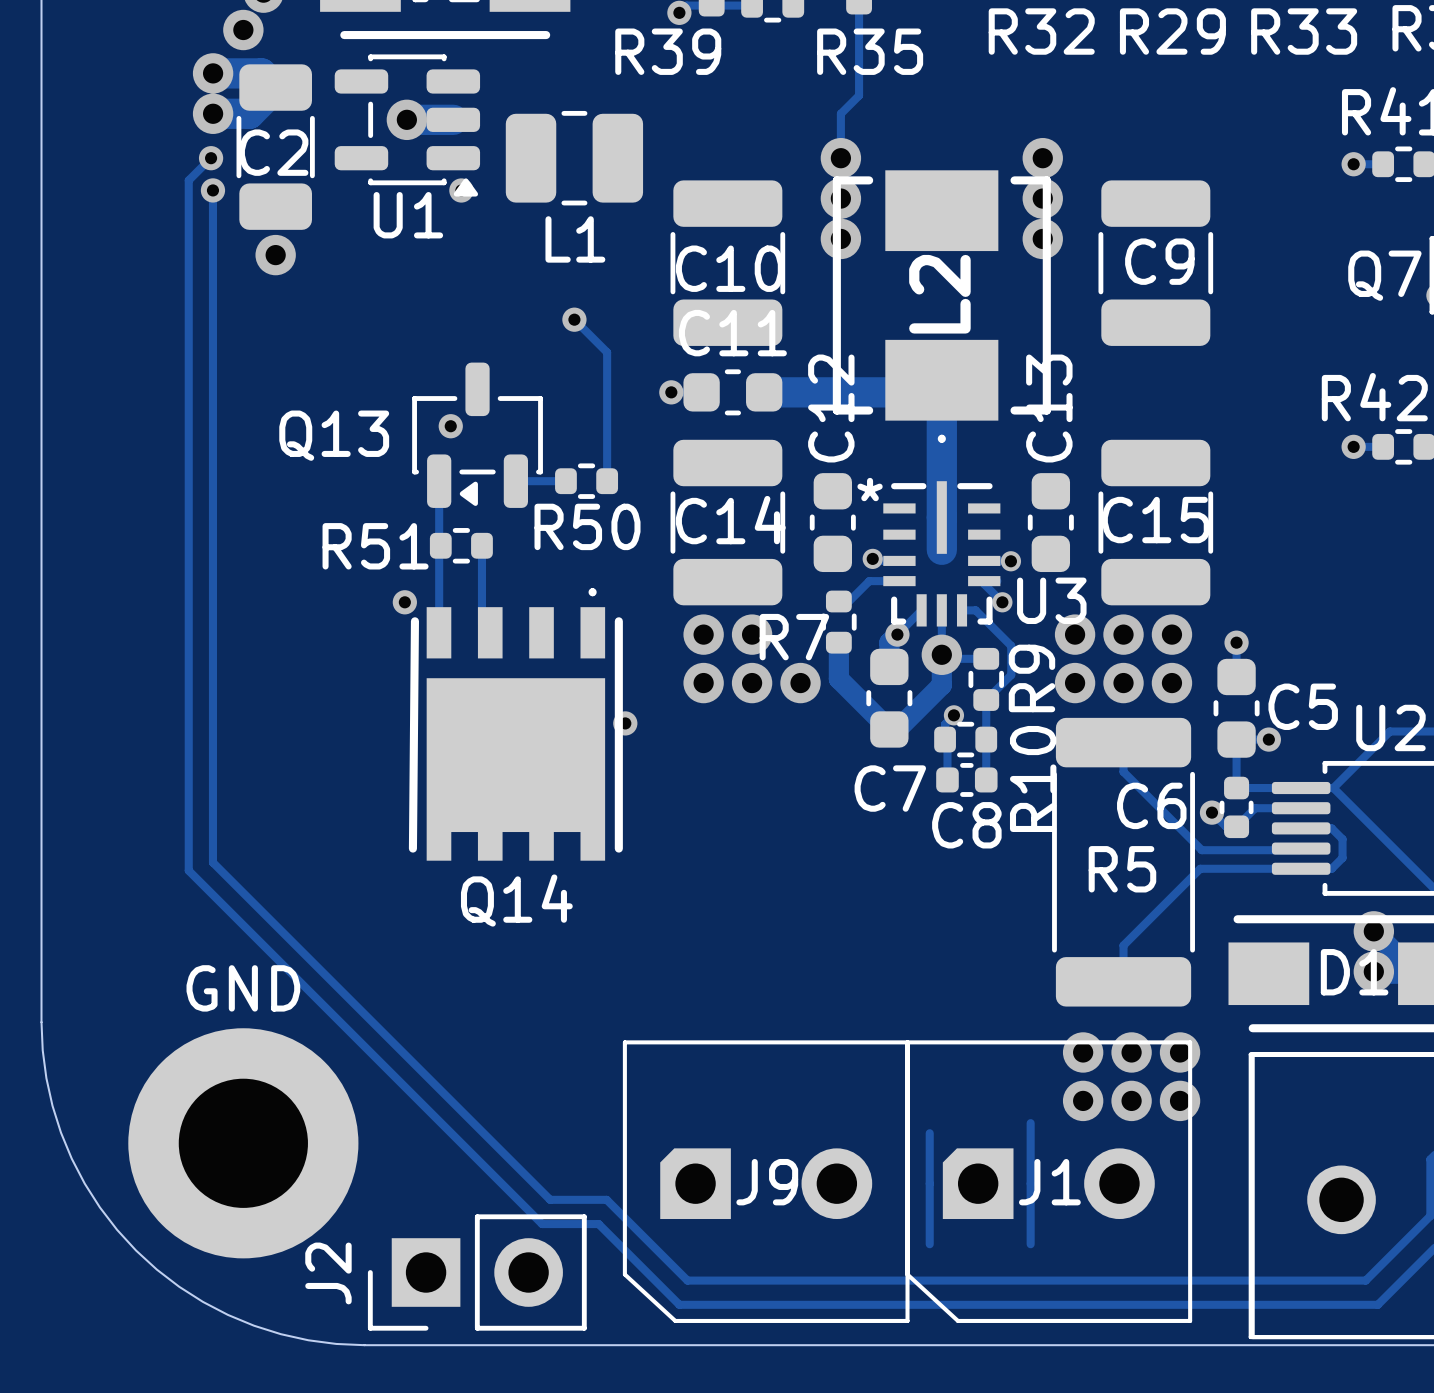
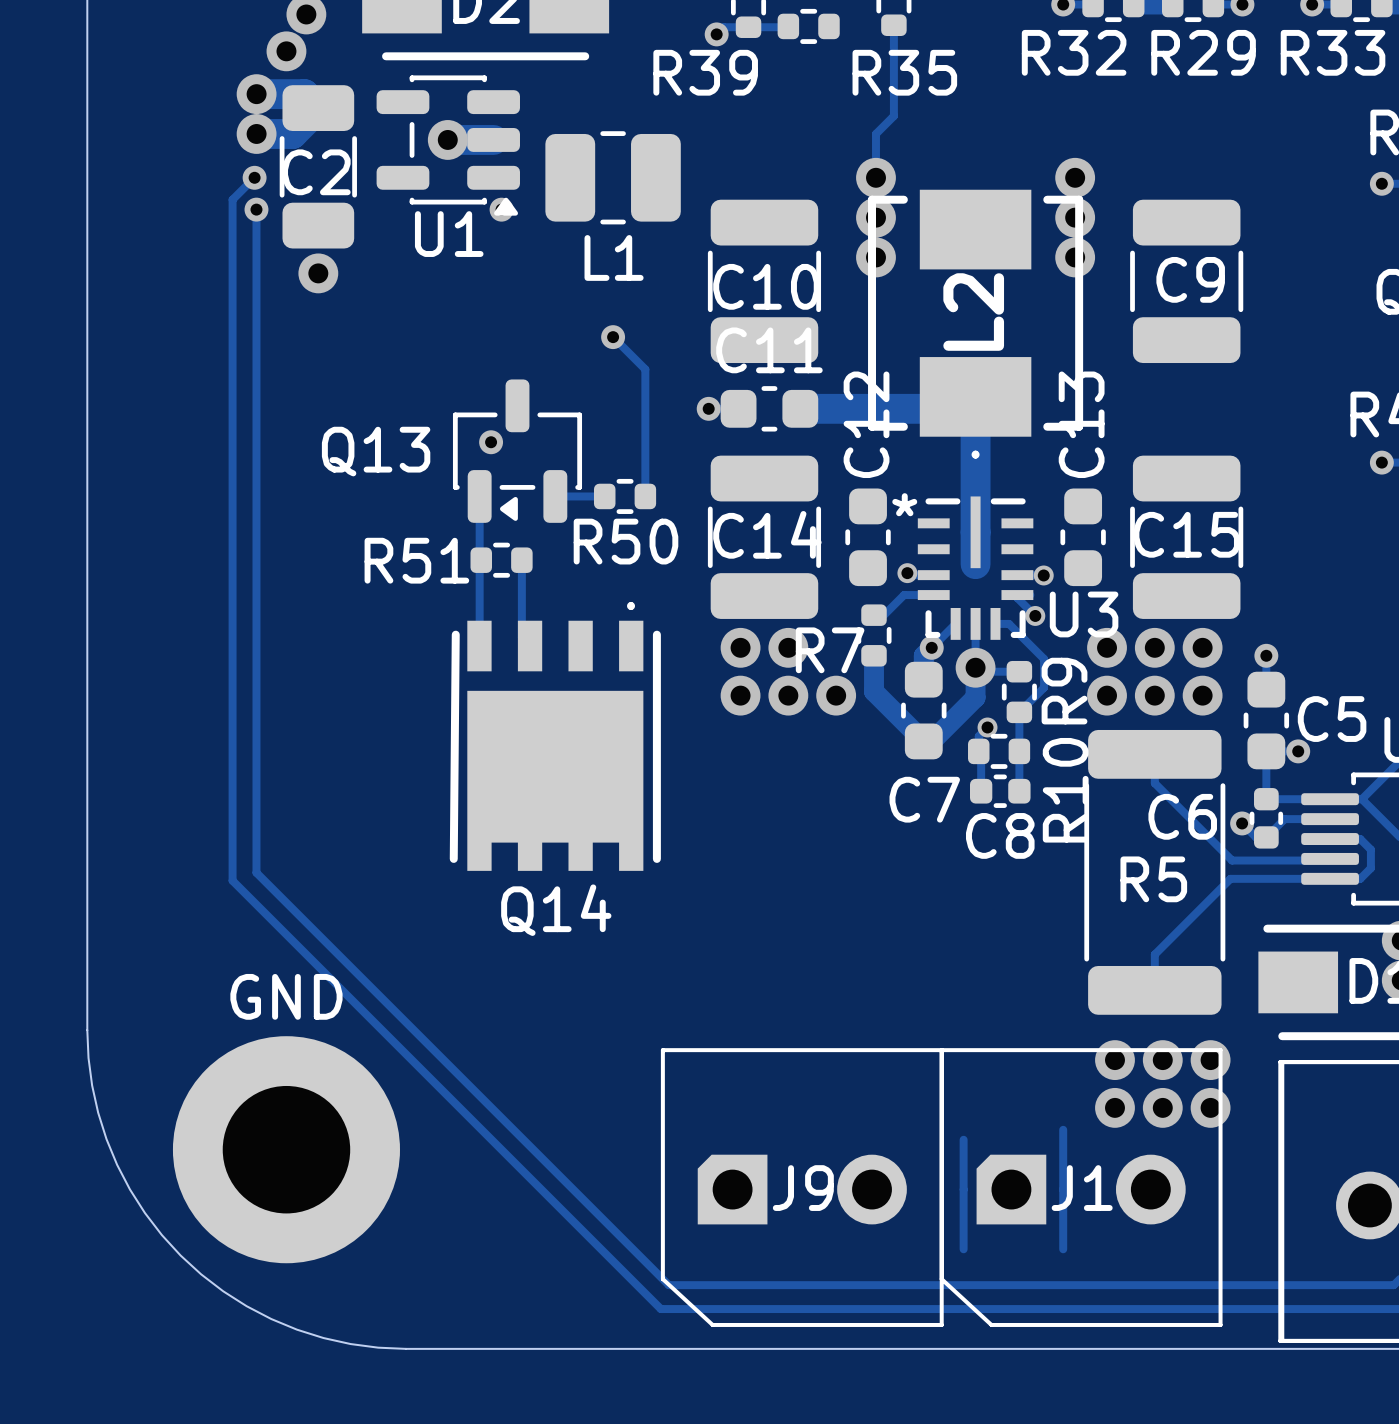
via: (404, 602) -> none
via: (625, 723) -> none
track: (550, 1199) (606, 1199) (687, 1280) -> (589, 1205) (668, 1285) (724, 1285)
track: (542, 1224) (598, 1224) (679, 1304) -> (581, 1229) (660, 1309) (716, 1309)
J2: (477, 1272) -> none

